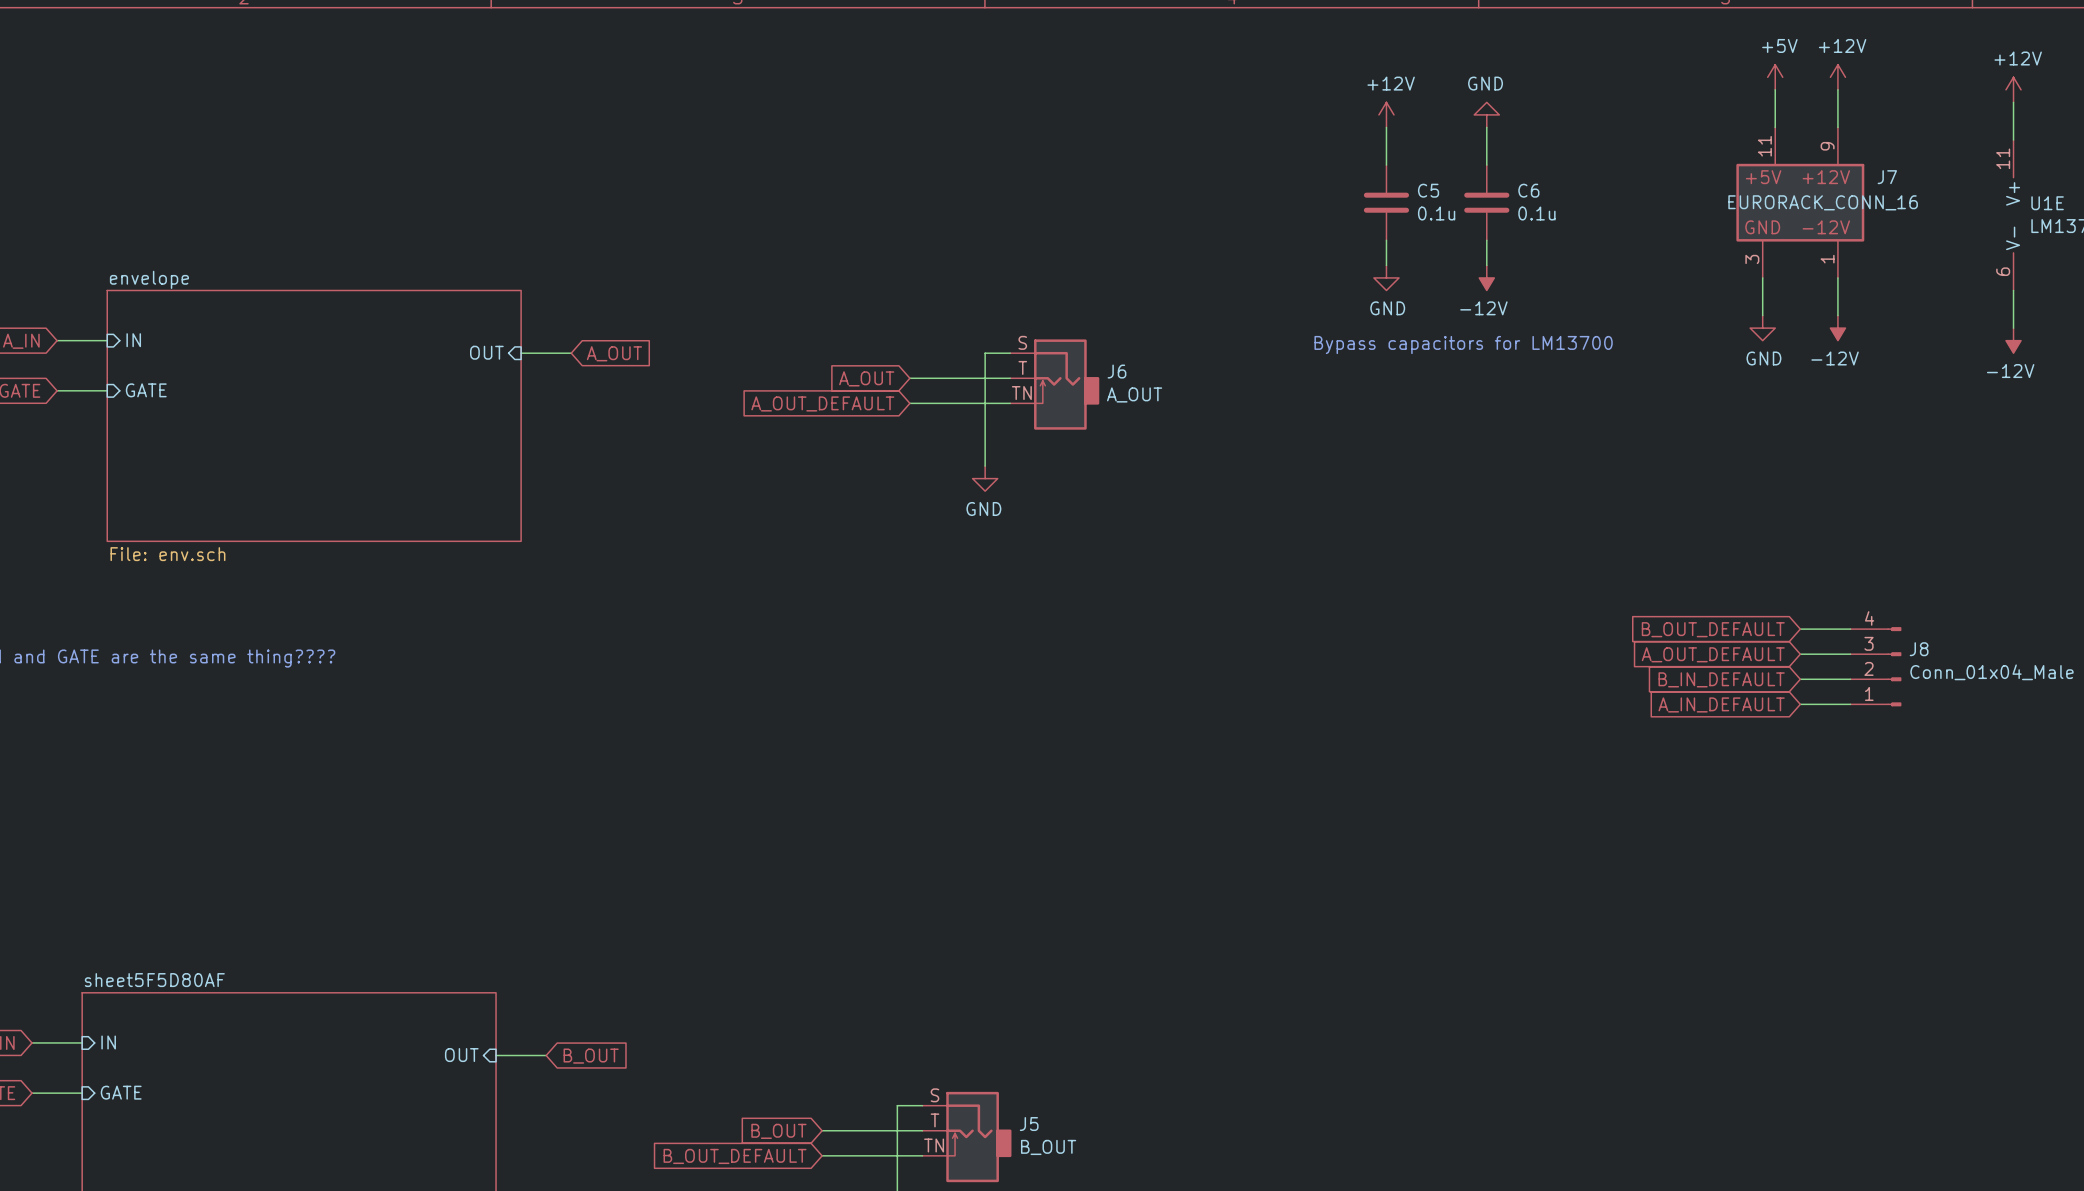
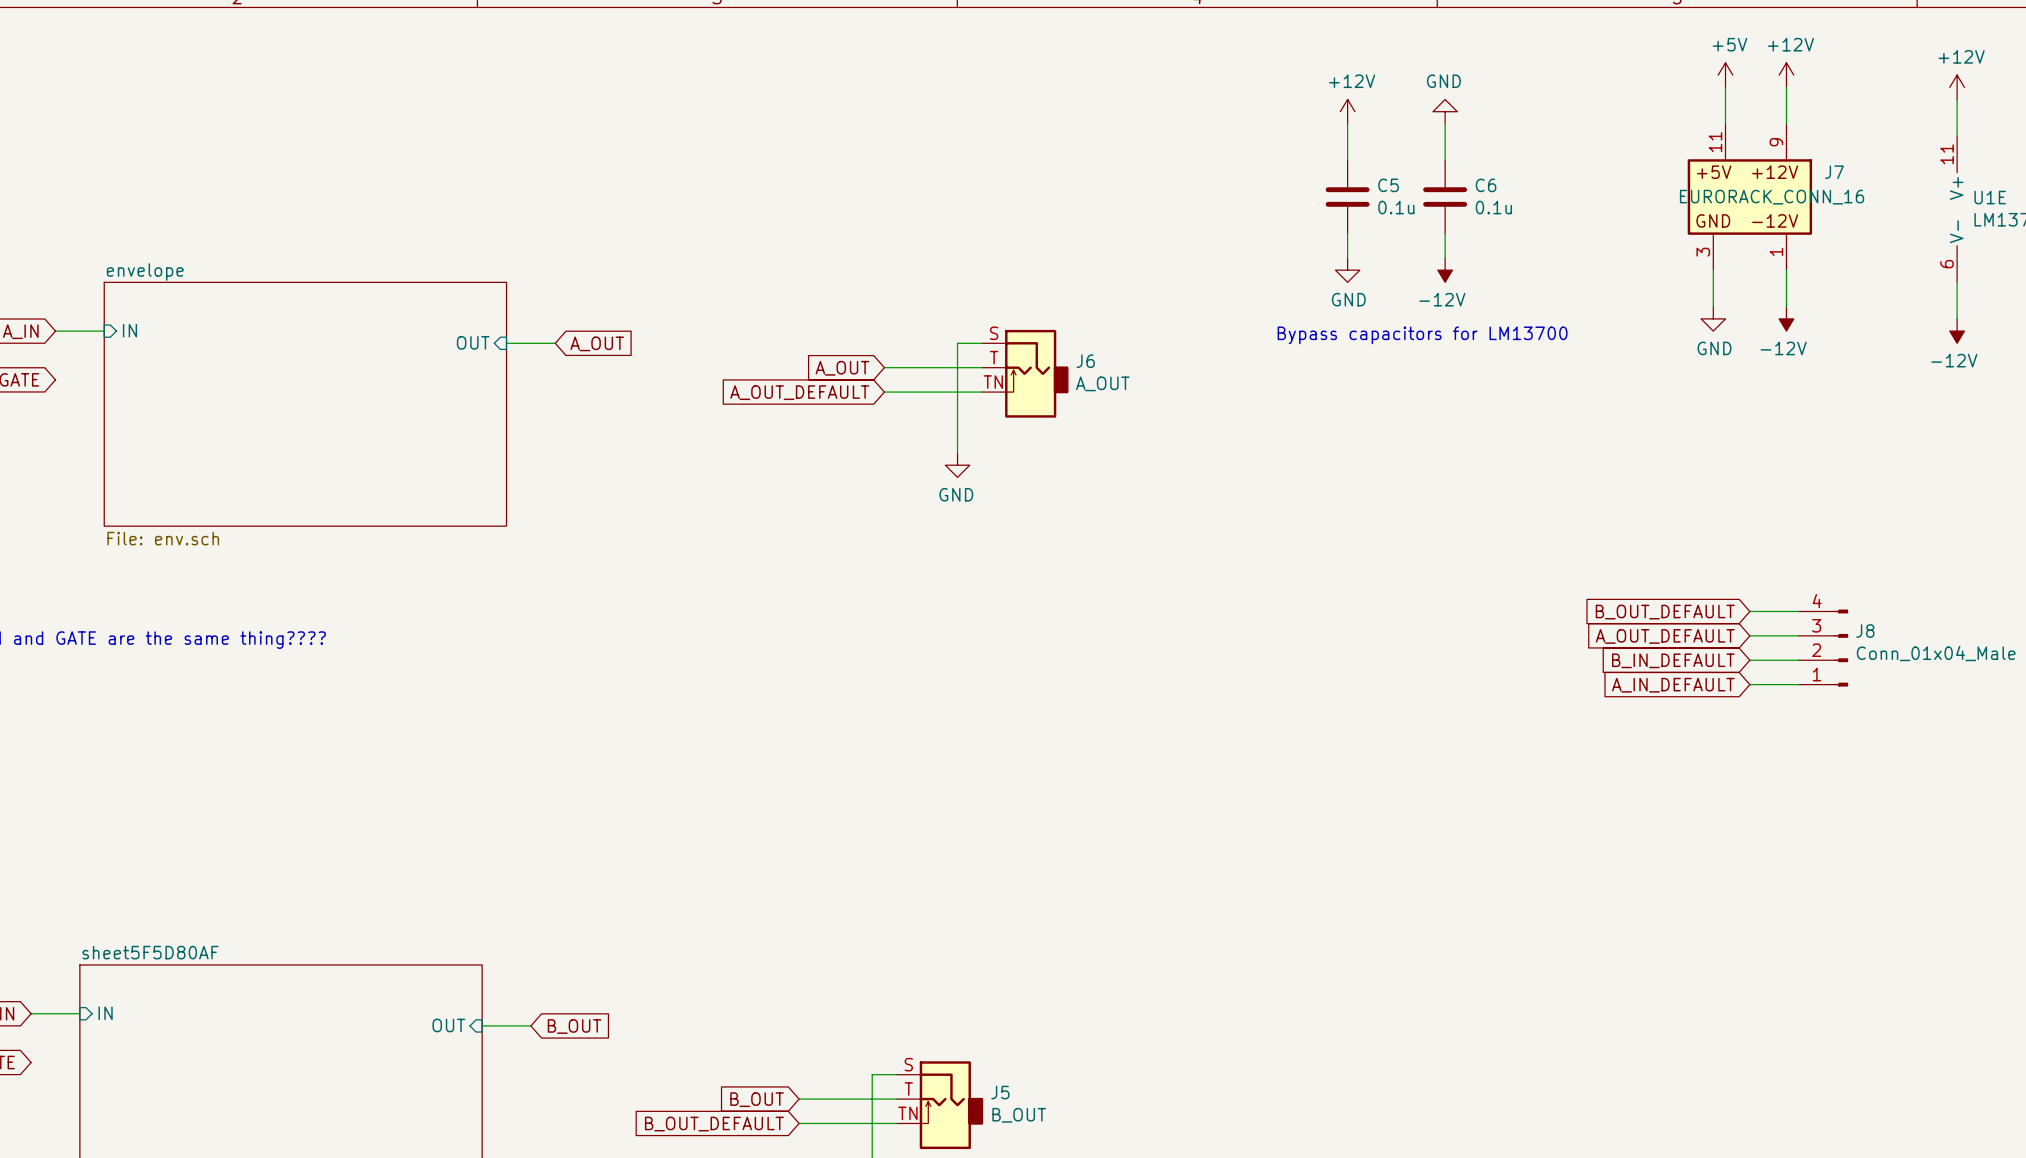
wire: (57, 390) (107, 390) -> none
sheet pin: GATE (146, 390) -> none
sheet pin: GATE (121, 1092) -> none
wire: (32, 1093) (82, 1093) -> none

